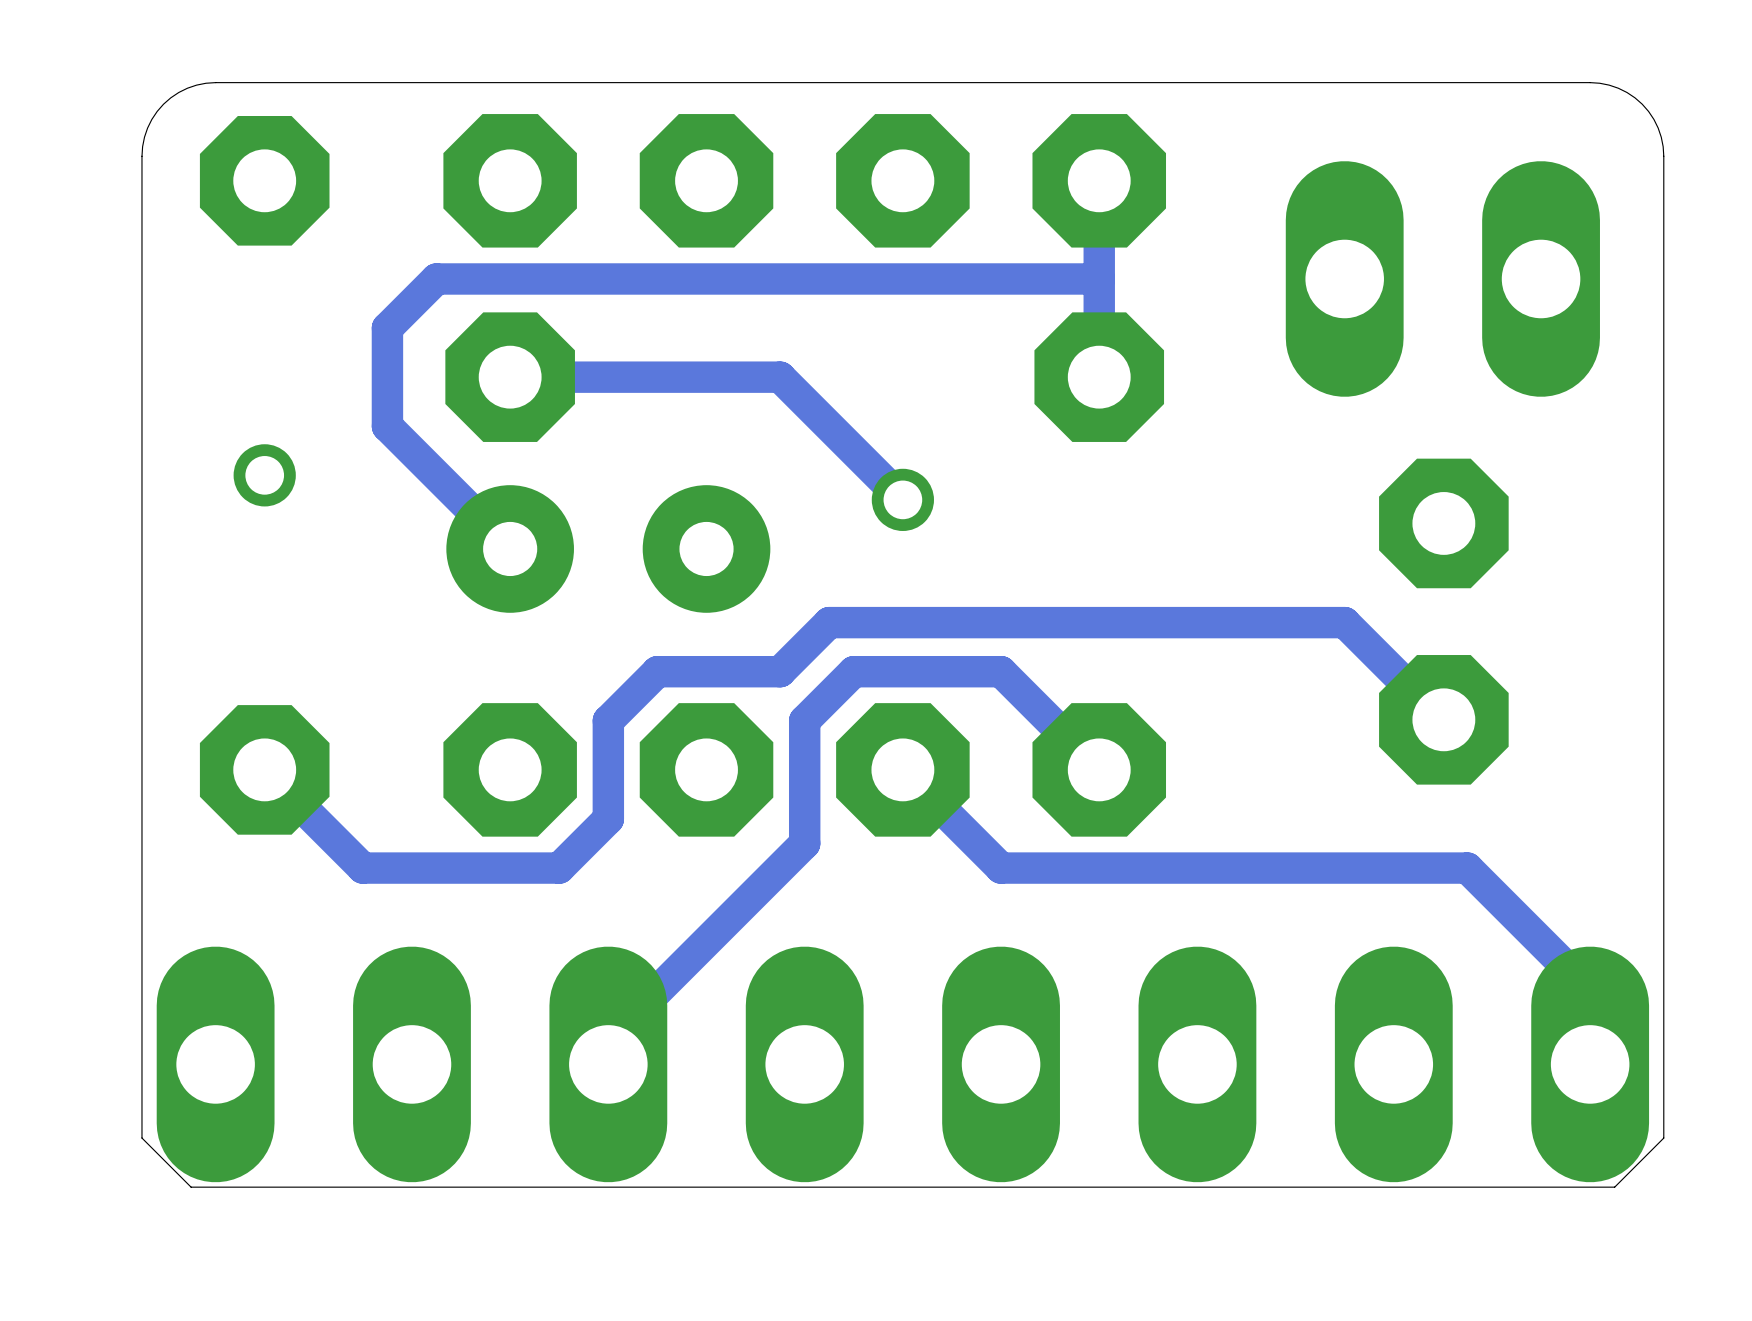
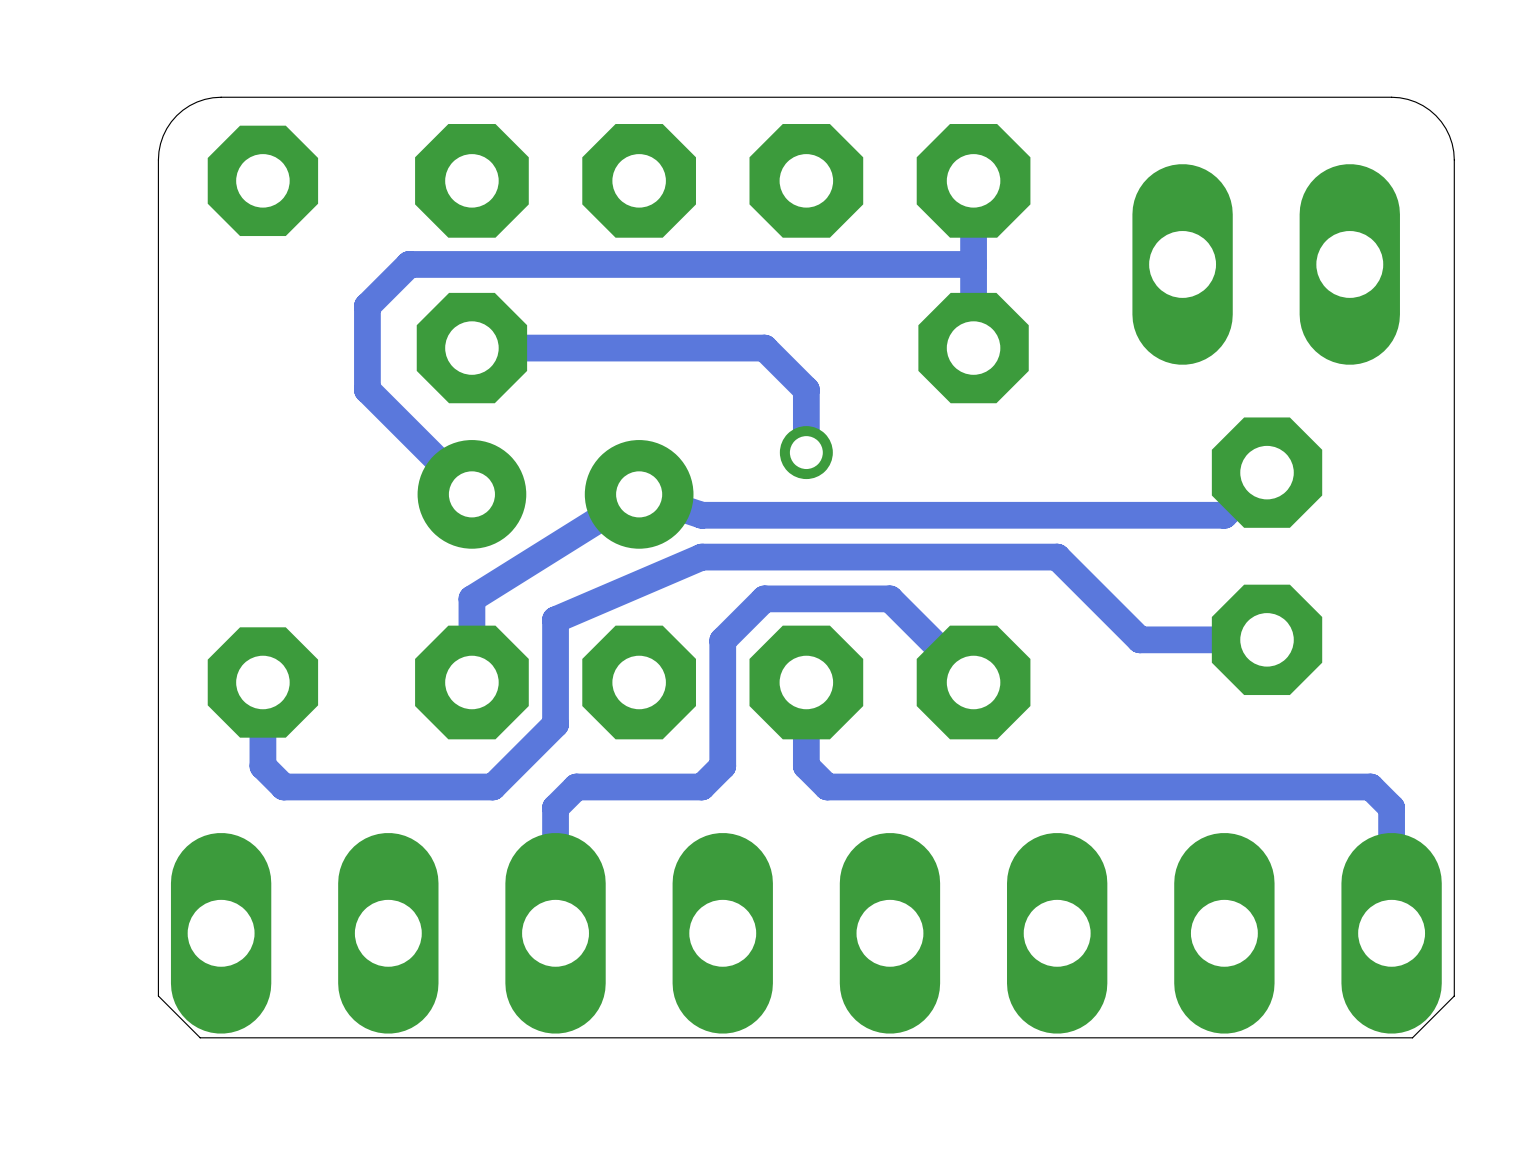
track: (780, 377) (902, 499) -> (701, 348) (764, 348) (806, 389) (806, 452)
via: (264, 475) -> none
track: none -> (1267, 472) (1224, 515) (701, 515) (639, 494) (471, 598) (471, 682)
track: (829, 622) (780, 671) (657, 671) (608, 720) -> (743, 557) (701, 557) (555, 619) (555, 640)
track: (1197, 622) (1344, 622) (1441, 719) -> (1057, 557) (1139, 639) (1265, 639)
track: (264, 769) (362, 868) (559, 868) -> (262, 682) (262, 766) (283, 787) (492, 787) (513, 766)
track: (902, 769) (1001, 868) (1467, 868) (1590, 990) -> (806, 682) (806, 766) (827, 787) (1370, 787) (1391, 807) (1391, 870)
track: (804, 843) (608, 1039) -> (722, 745) (722, 766) (701, 787) (576, 787) (555, 807) (555, 912)

